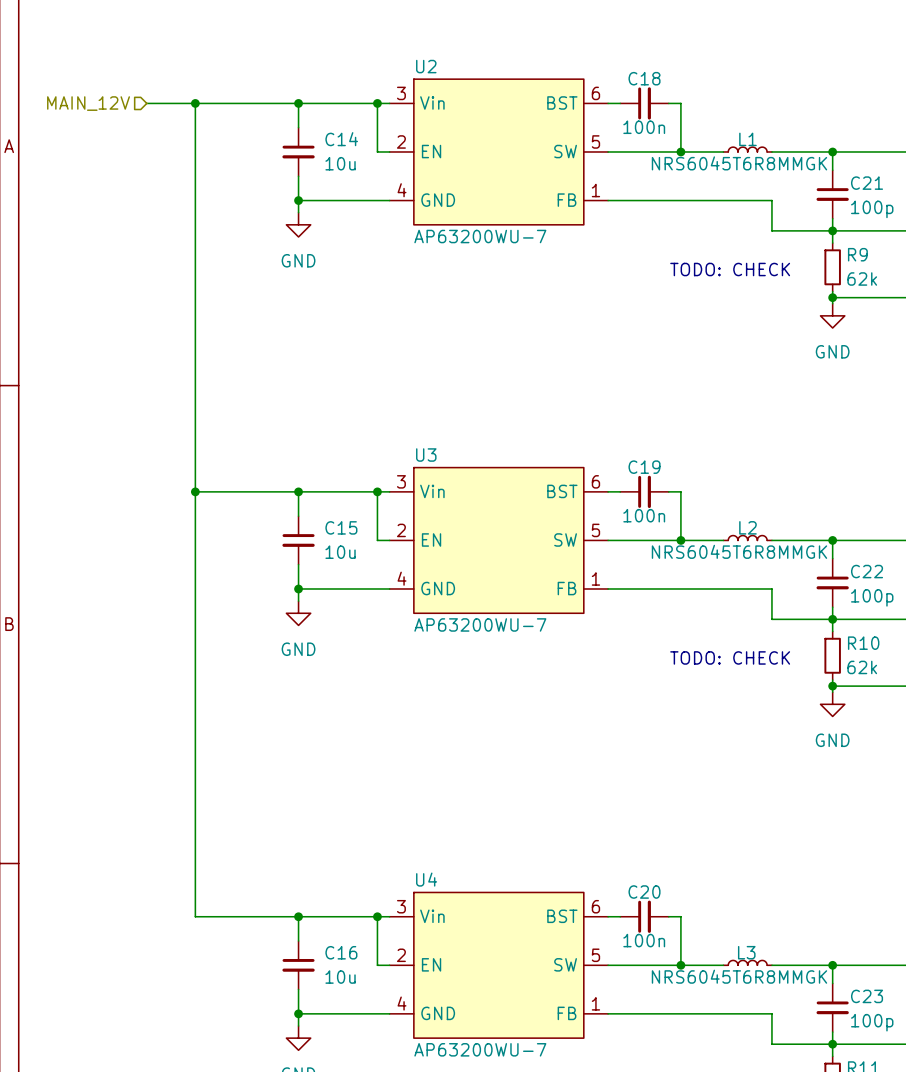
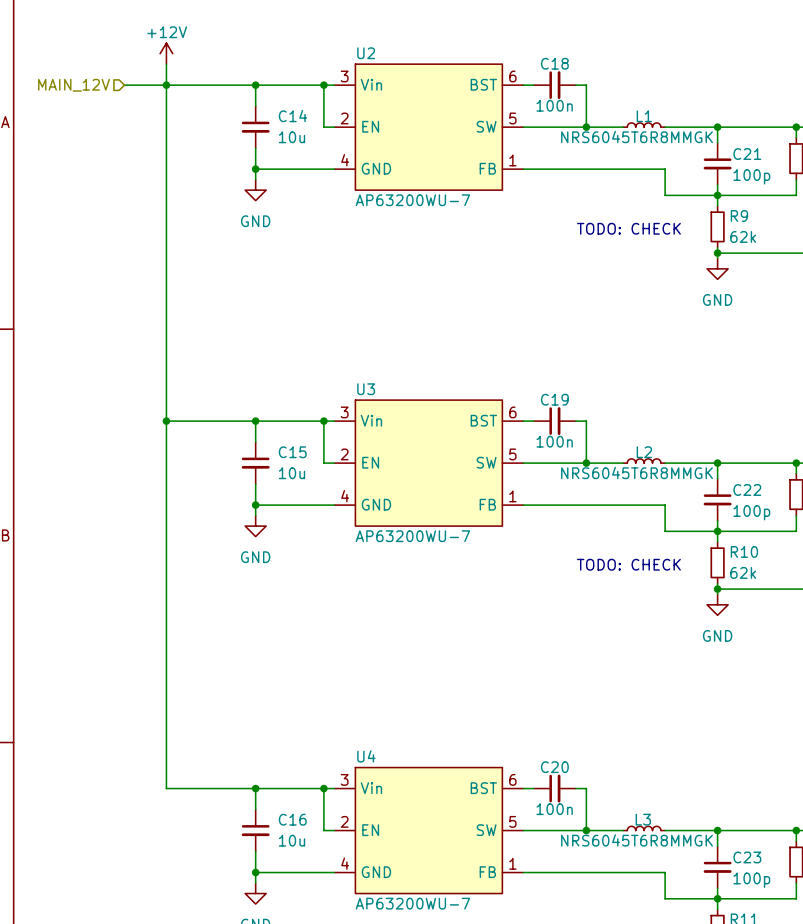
power symbol: none -> +12V (166, 53)
wire: none -> (166, 64) (166, 85)

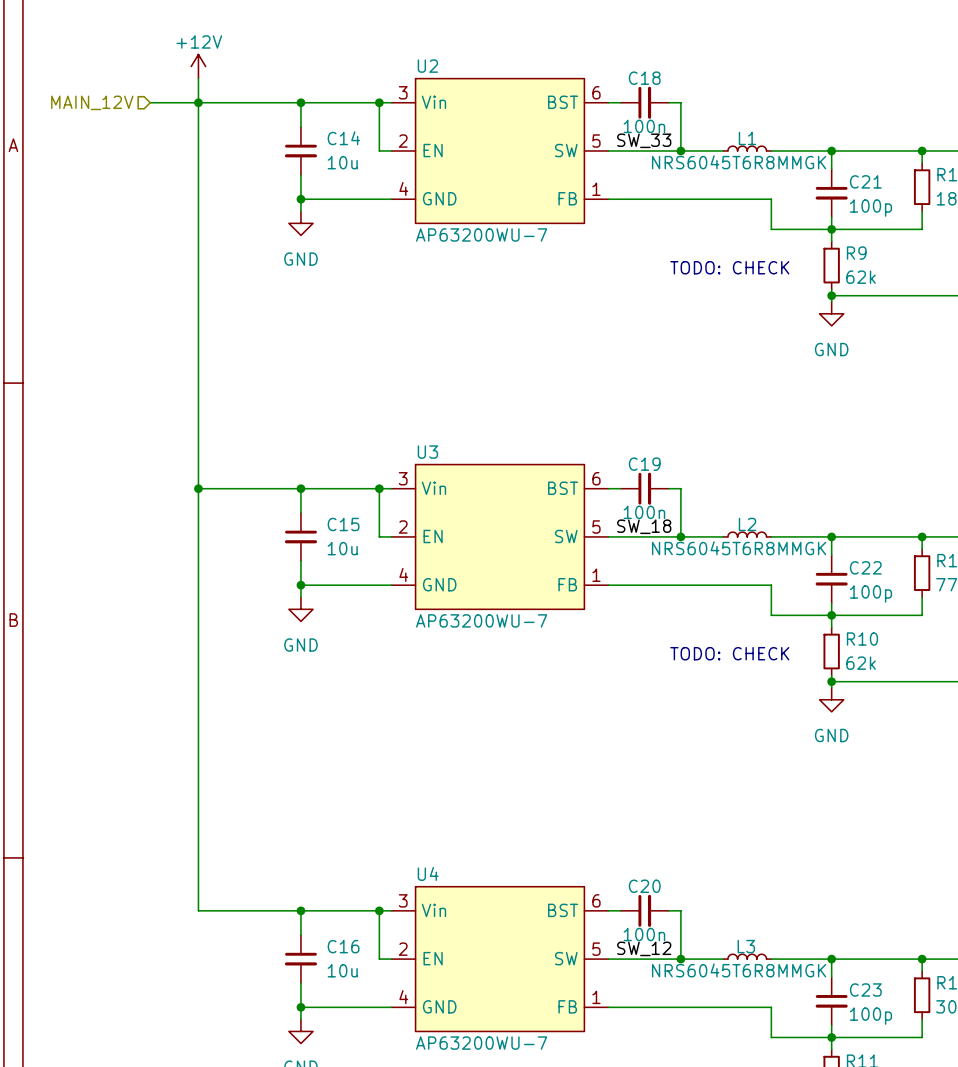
label: none -> SW_33 (644, 140)
label: none -> SW_18 (644, 526)
label: none -> SW_12 (644, 948)

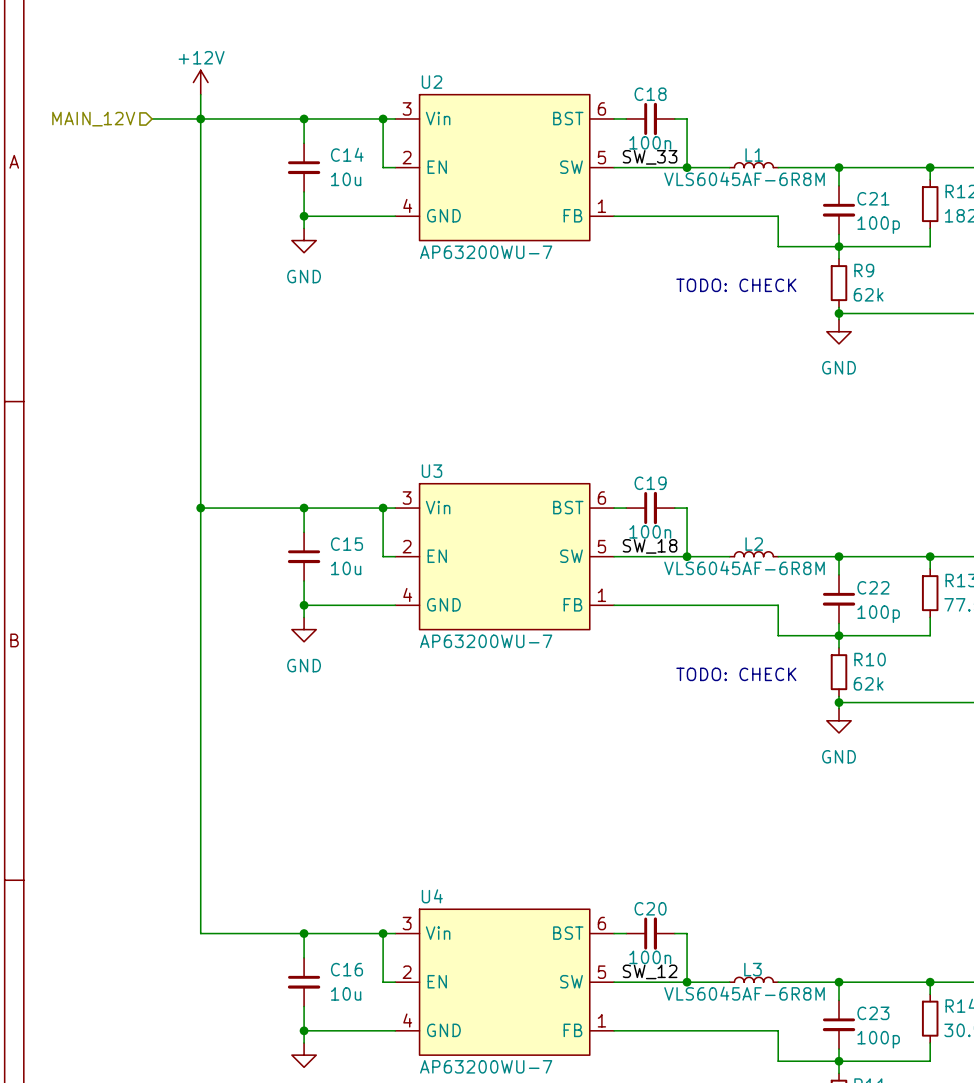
L1 value: NRS6045T6R8MMGK (739, 162) -> VLS6045AF-6R8M (744, 179)
L2 value: NRS6045T6R8MMGK (739, 548) -> VLS6045AF-6R8M (744, 568)
L3 value: NRS6045T6R8MMGK (739, 970) -> VLS6045AF-6R8M (744, 993)

